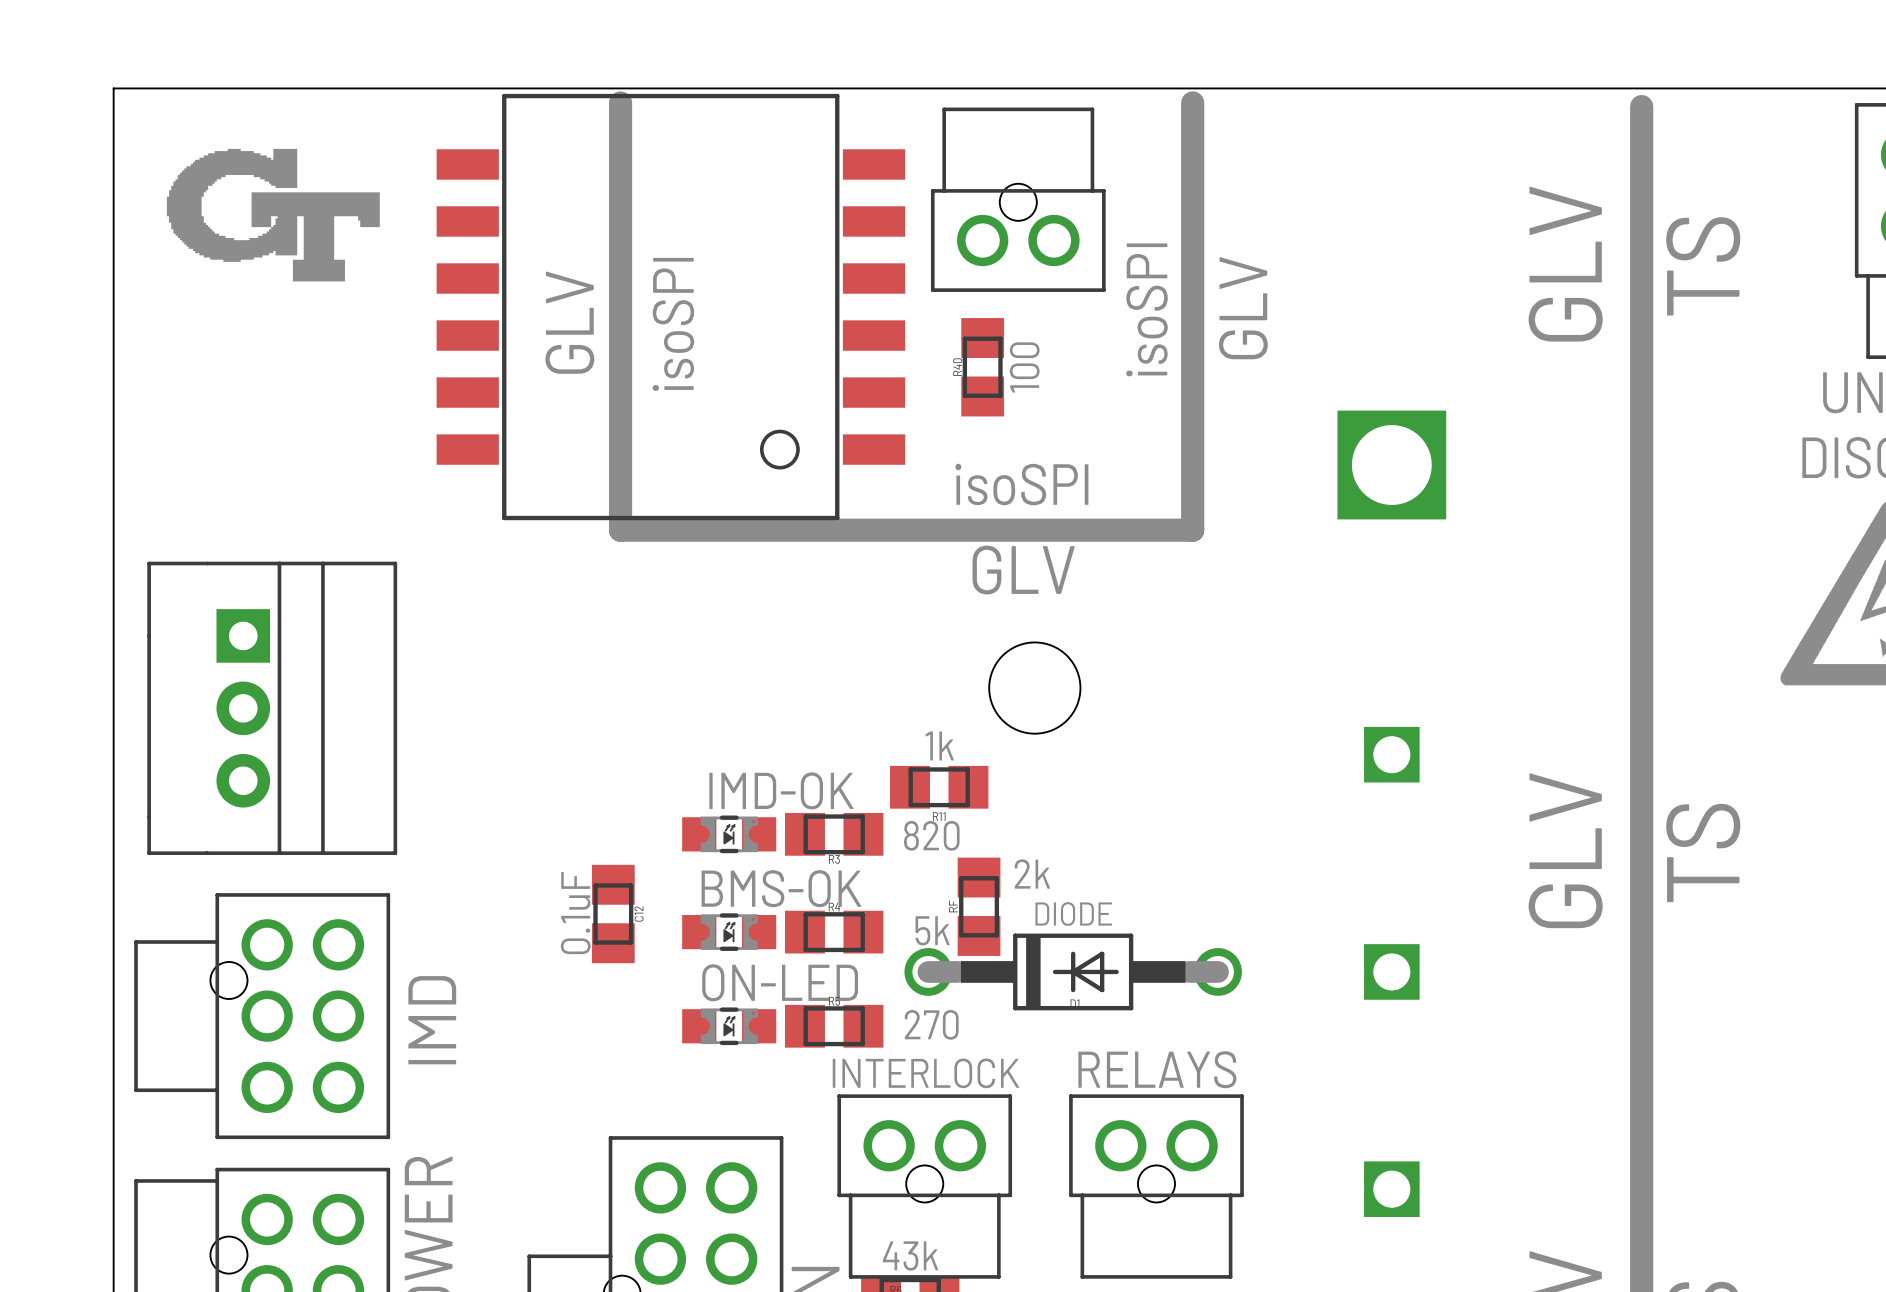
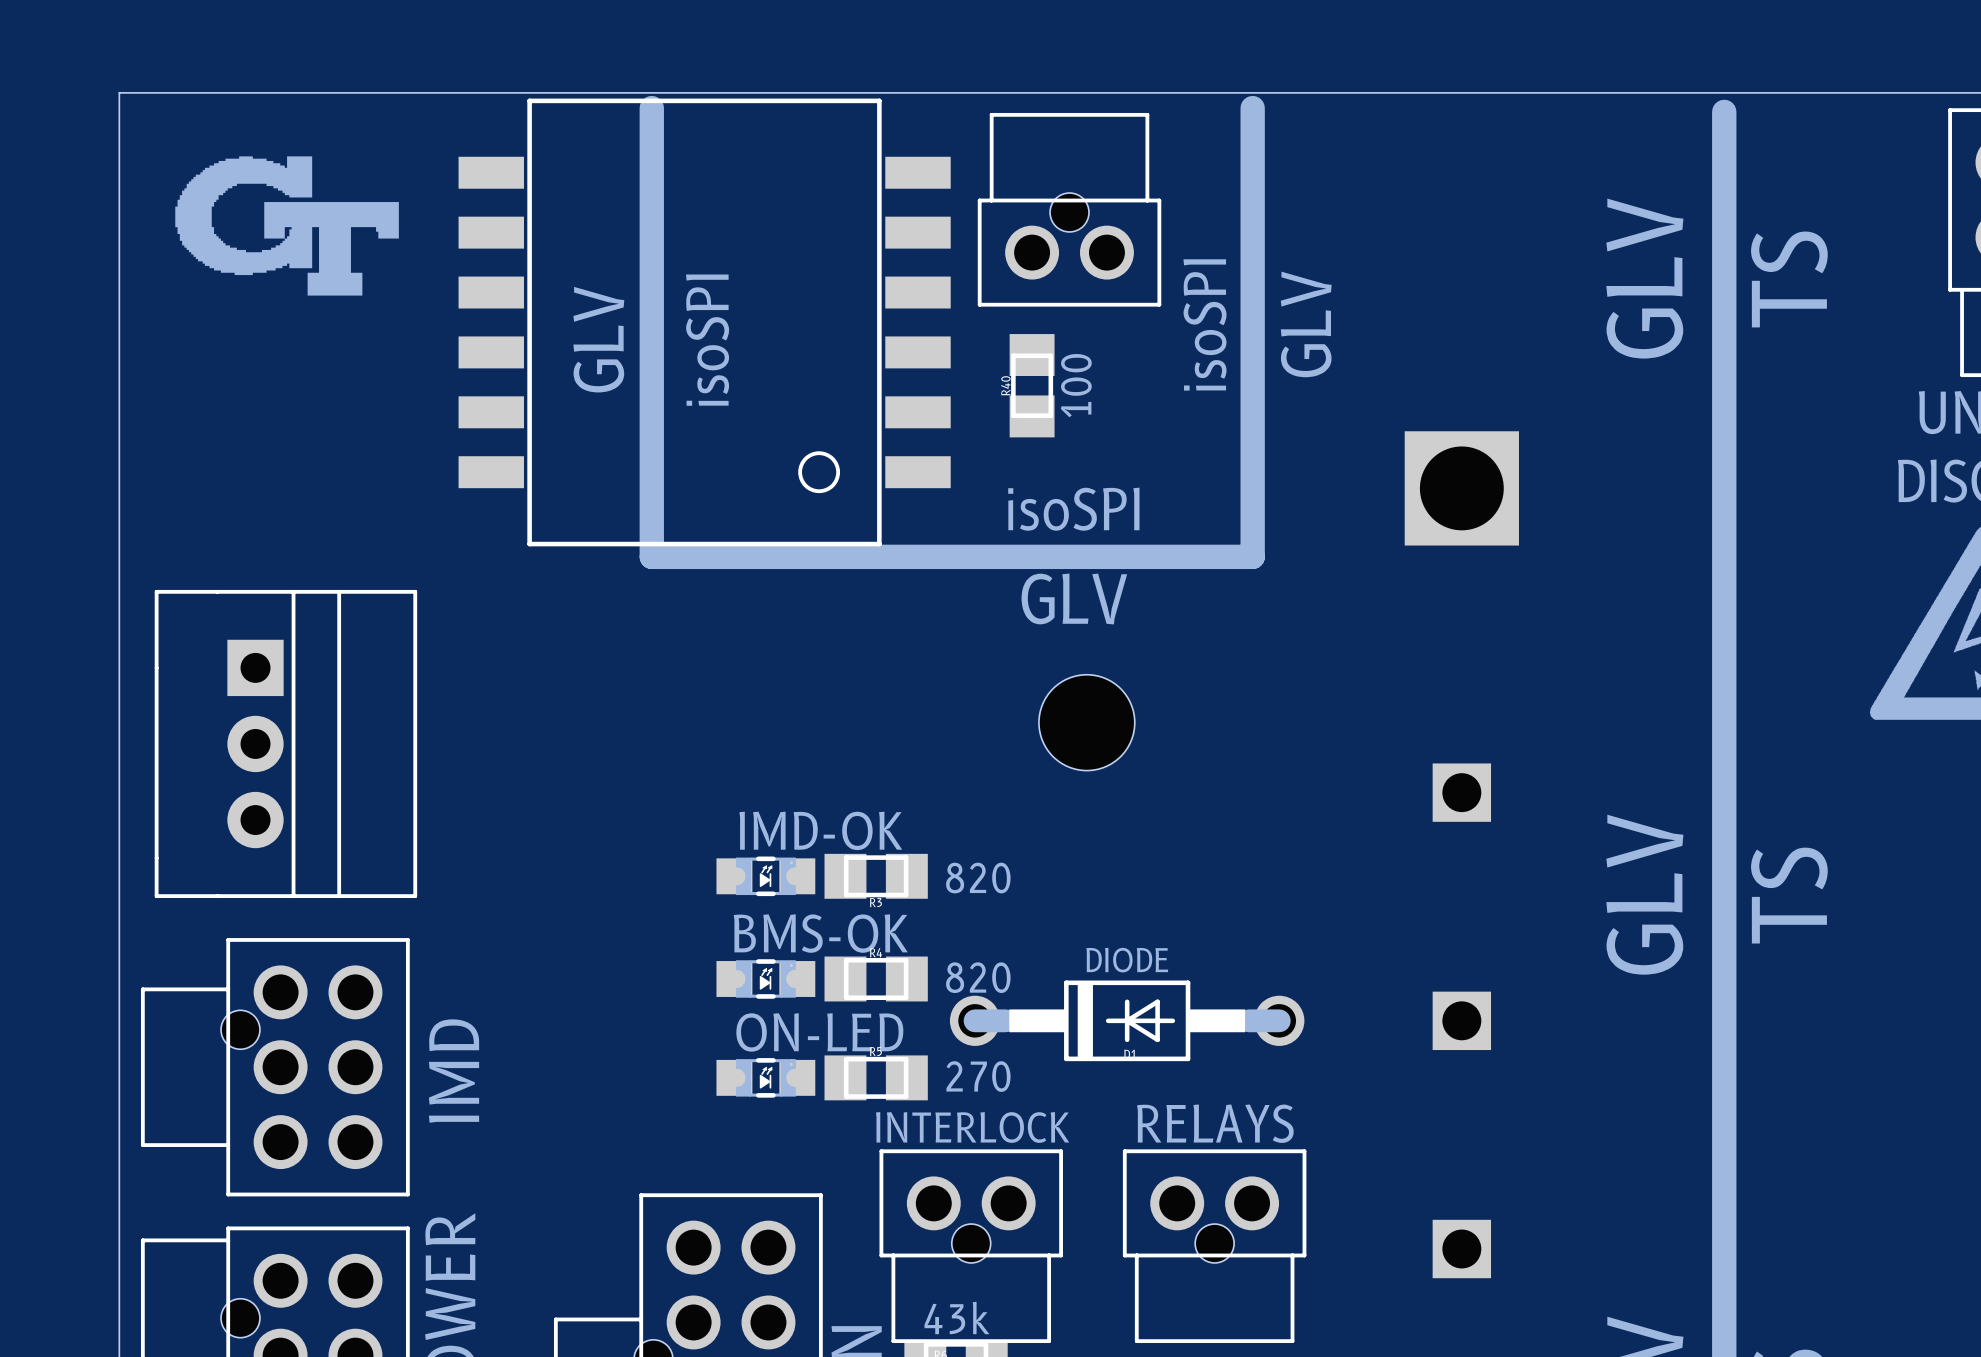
R11: 1k (939, 787) -> none
RF: 2k (979, 906) -> none
C12: 0.1uF (613, 914) -> none
R4 value: 5k (932, 930) -> 820 (978, 977)

